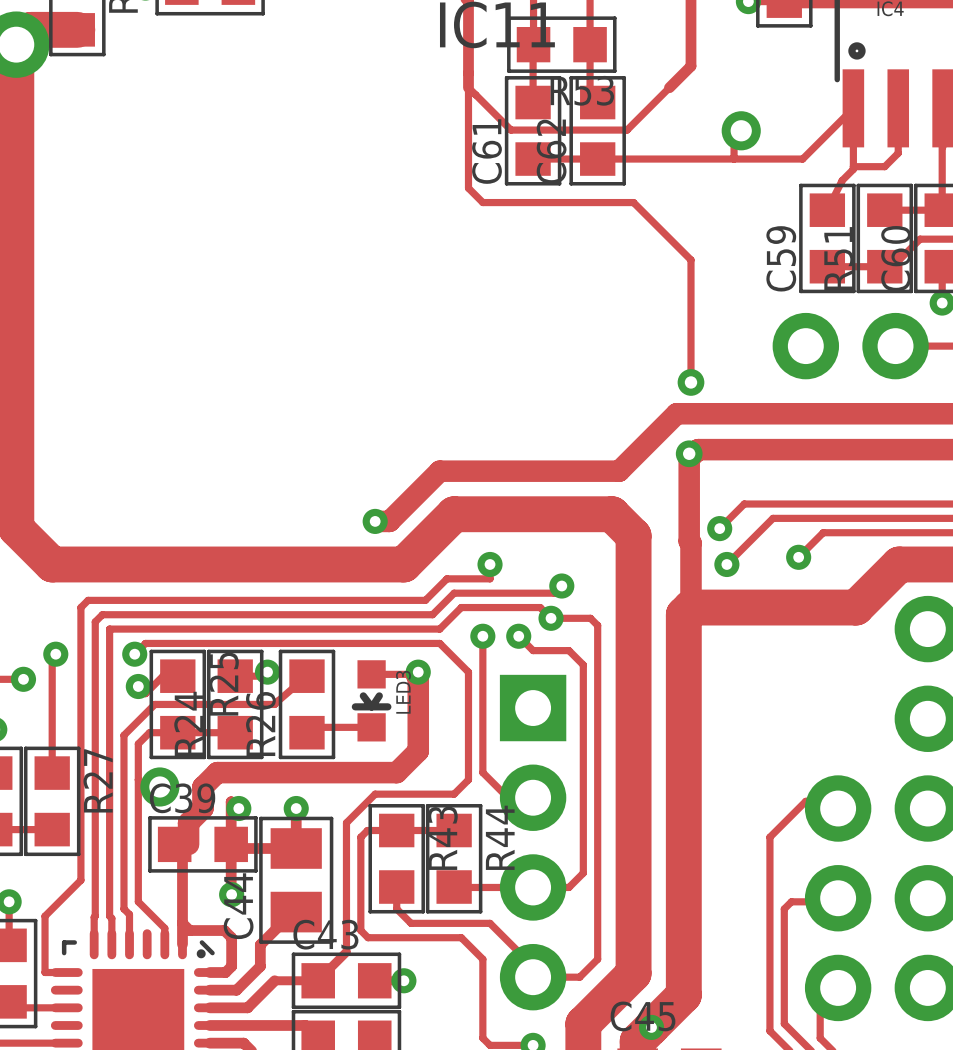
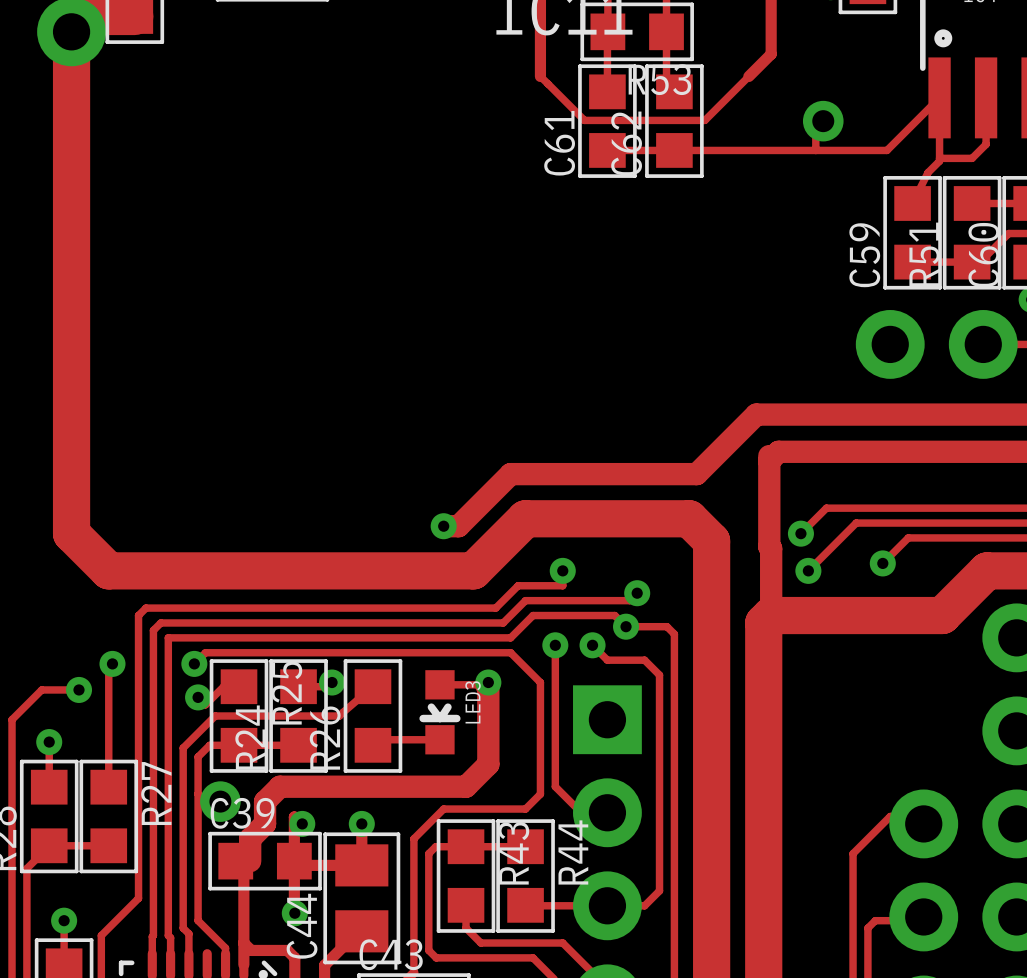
track: (468, 73) (468, 188) (482, 202) (633, 202) (690, 259) (690, 382) -> none
via: (690, 382) -> none
via: (689, 453) -> none

